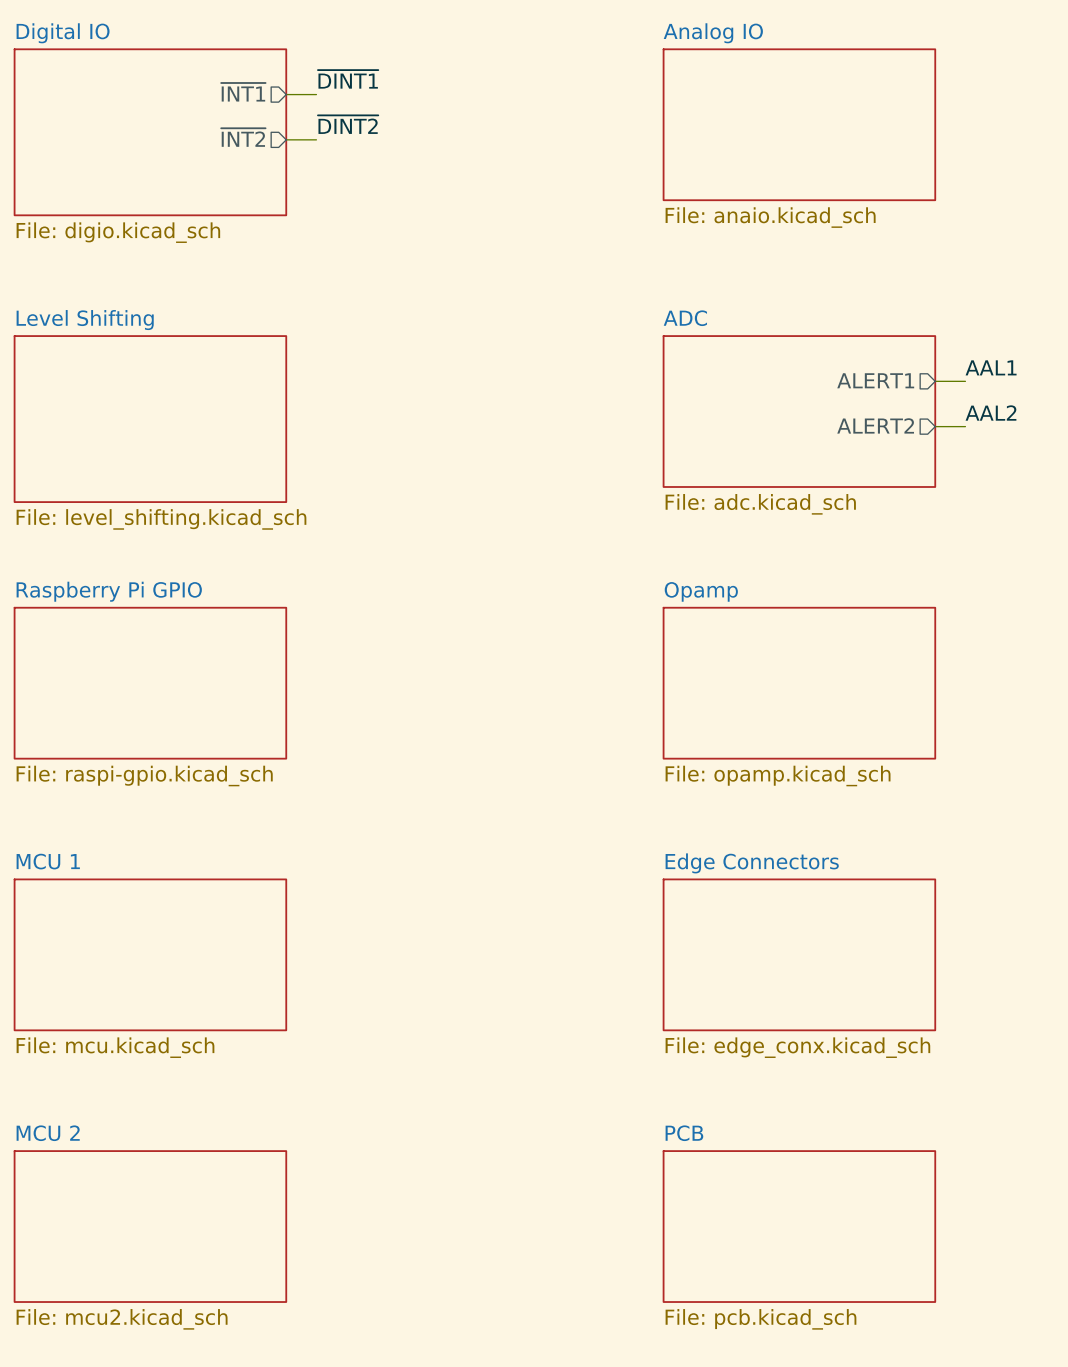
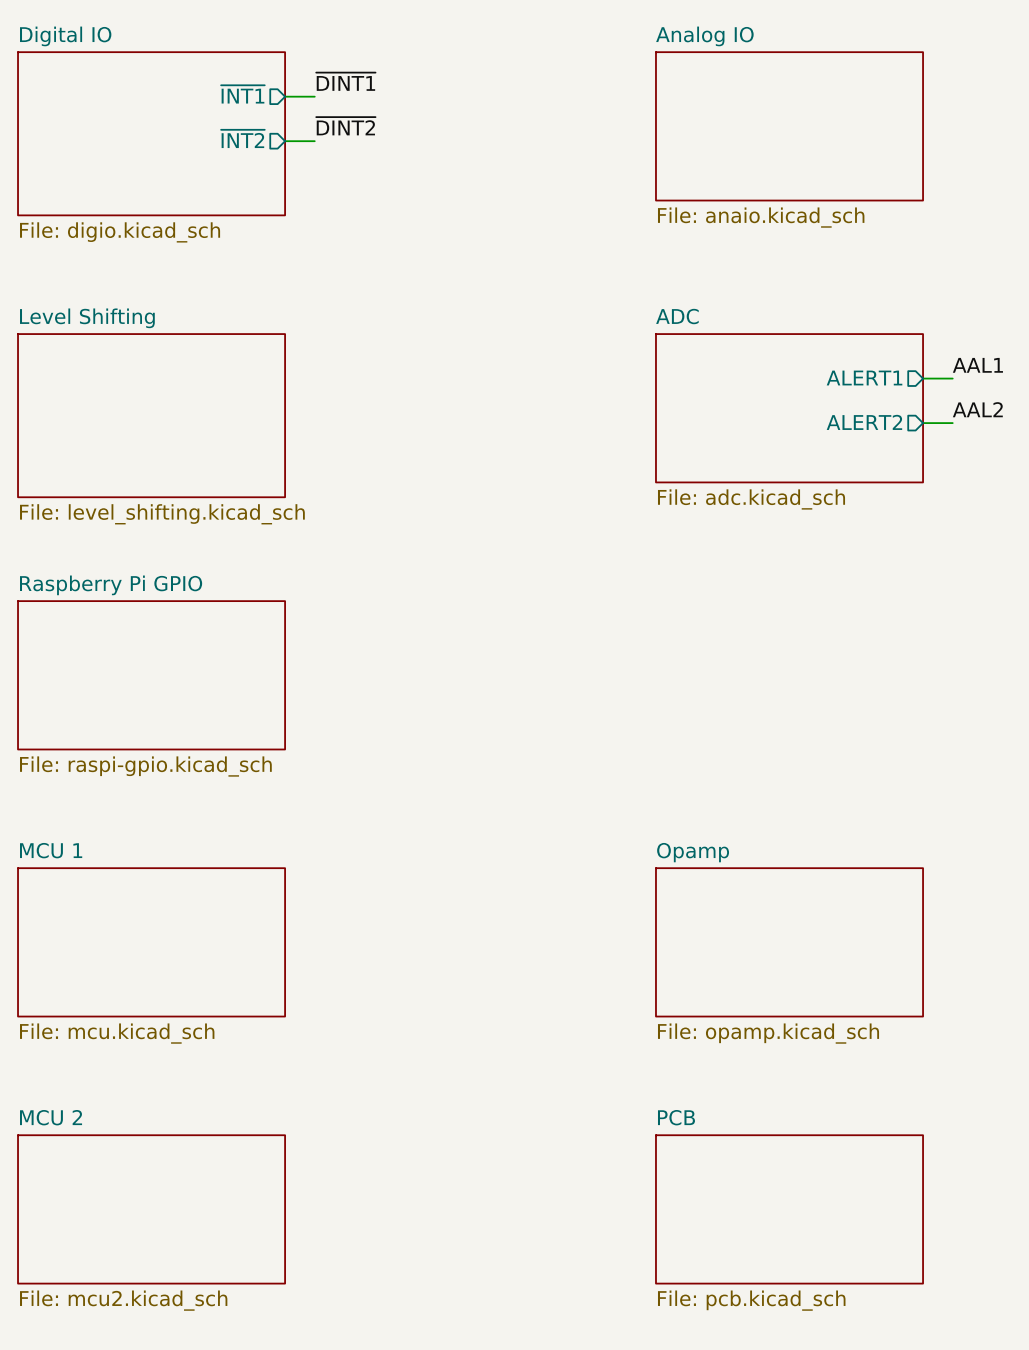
sheet Opamp: File: opamp.kicad_sch (799, 683) -> none
sheet Edge Connectors name: Edge Connectors (752, 863) -> Opamp (693, 852)
sheet Edge Connectors value: File: edge_conx.kicad_sch (797, 1047) -> File: opamp.kicad_sch (768, 1033)

